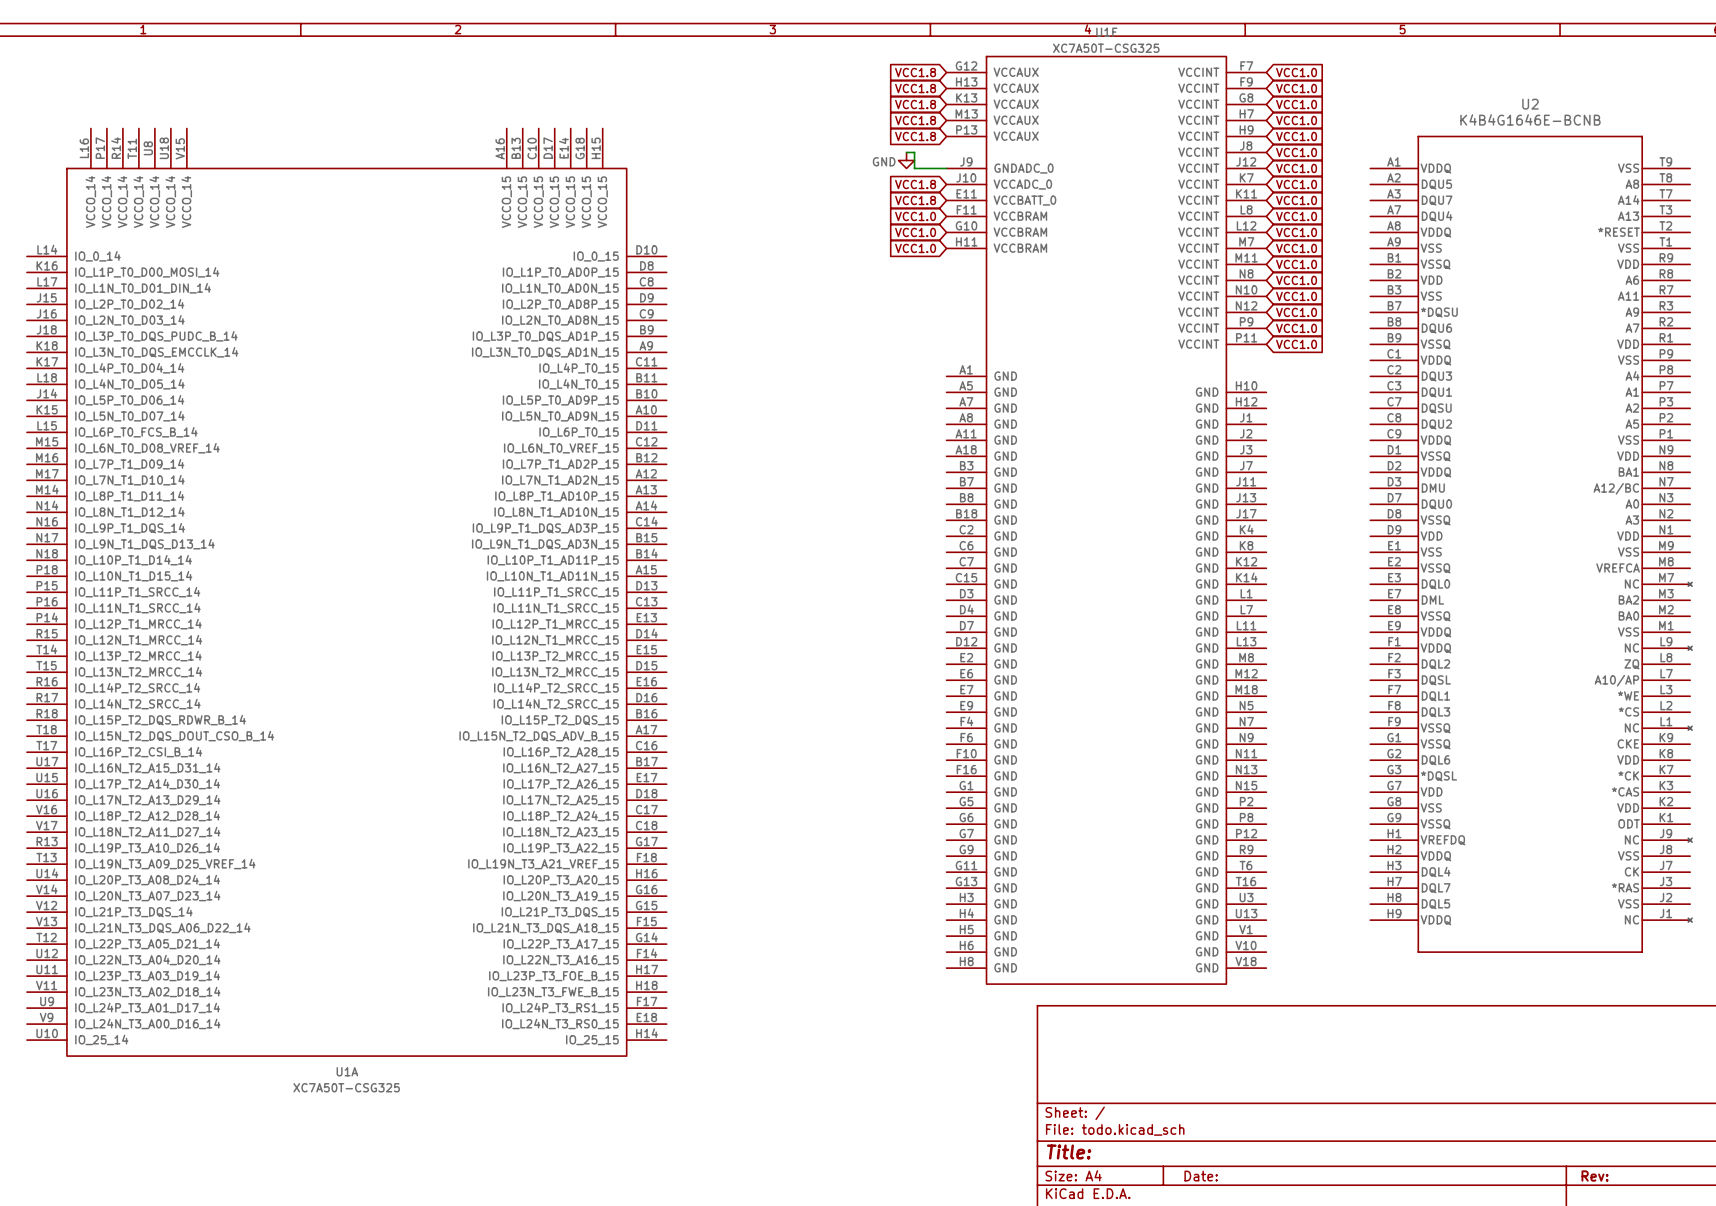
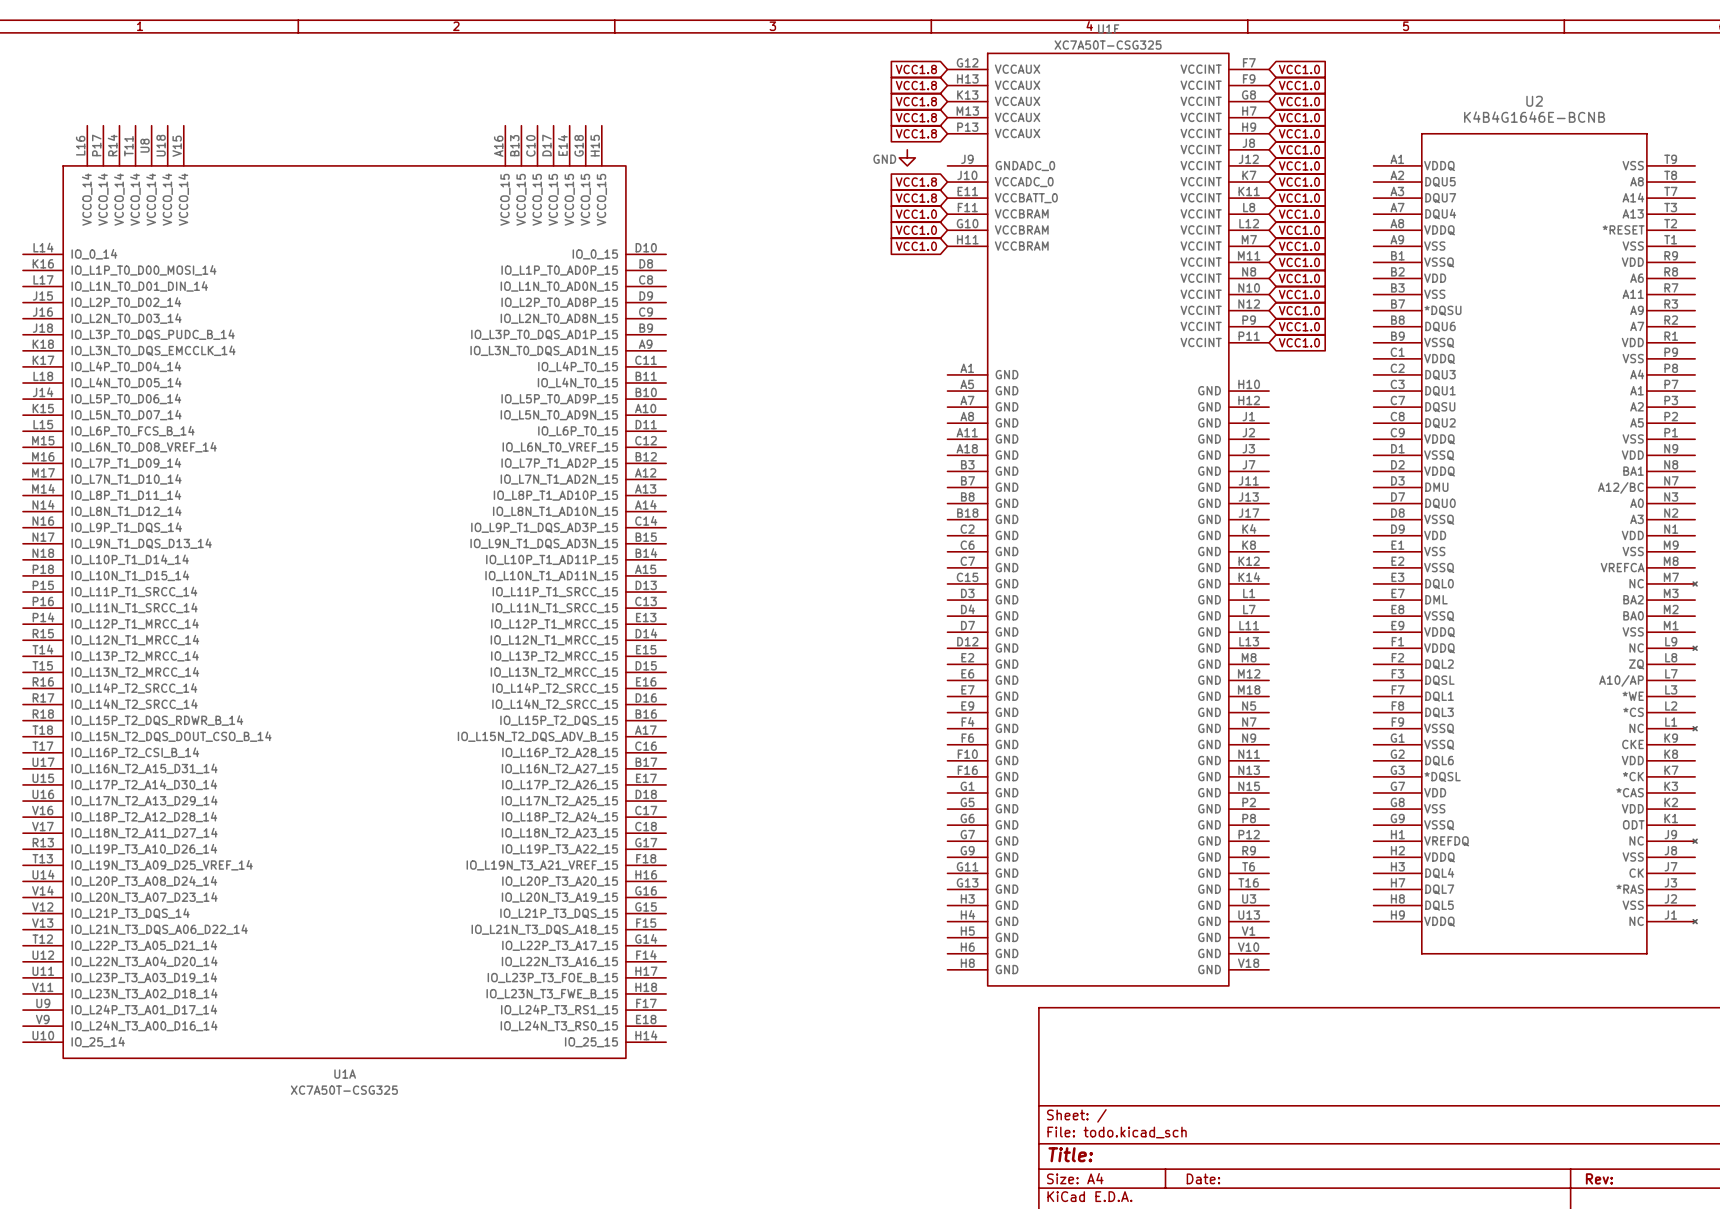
wire: (906, 152) (914, 152) (914, 168) (946, 168) -> none

